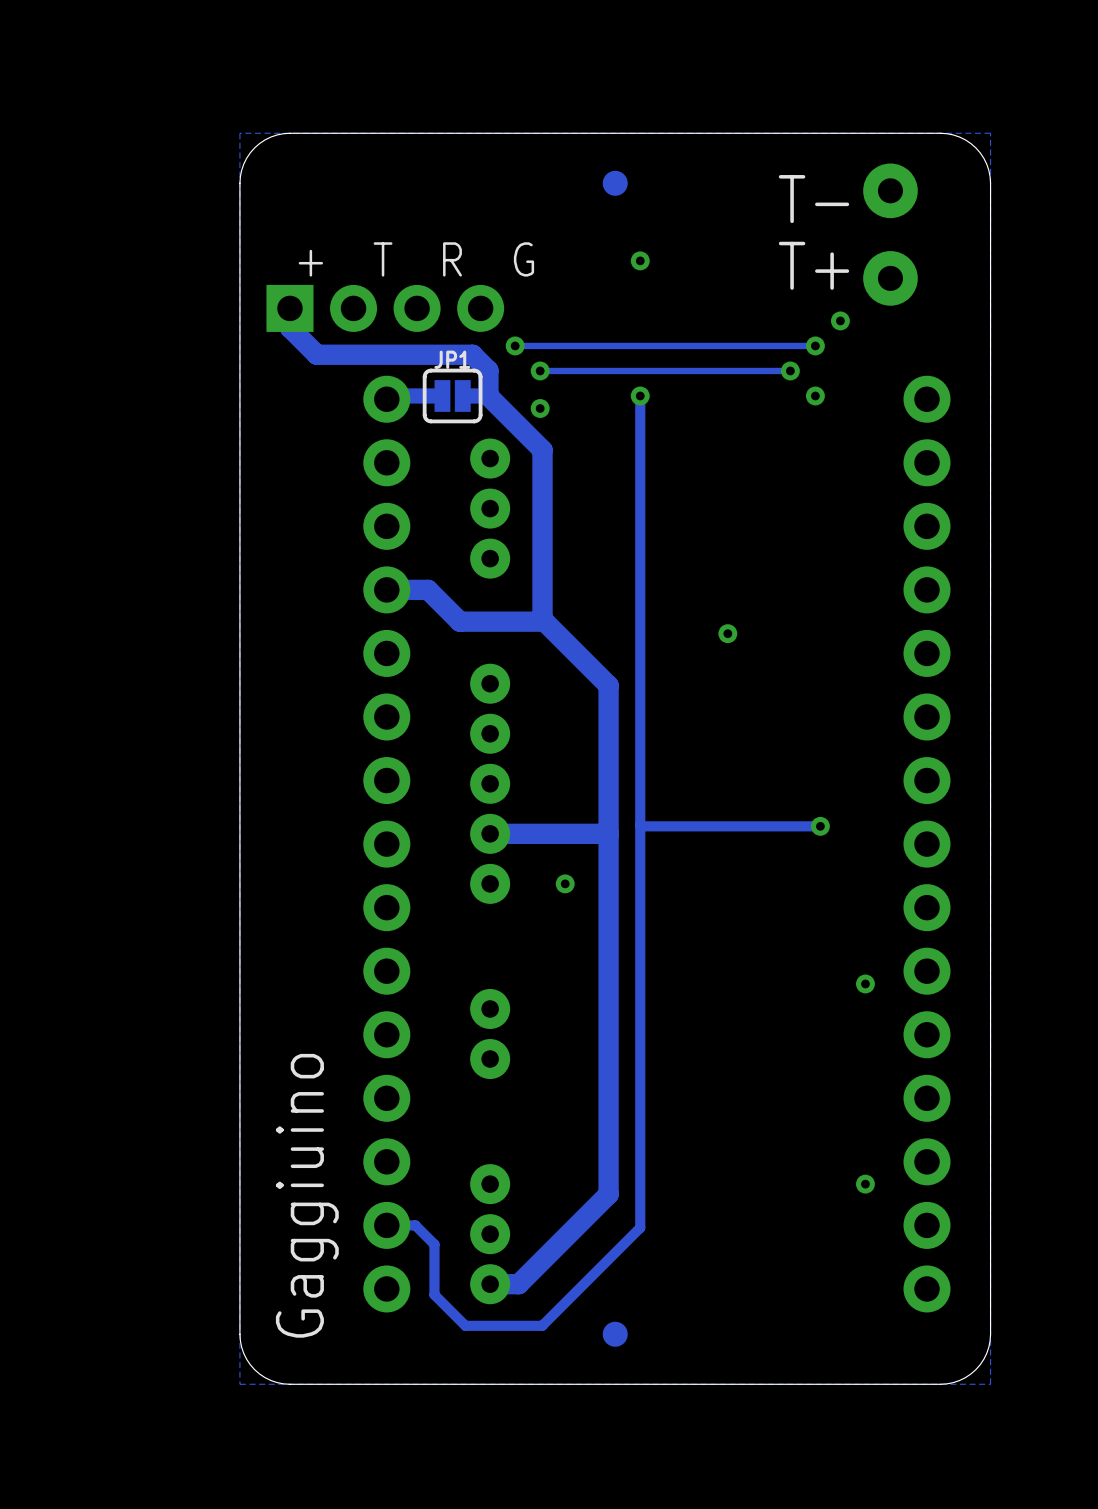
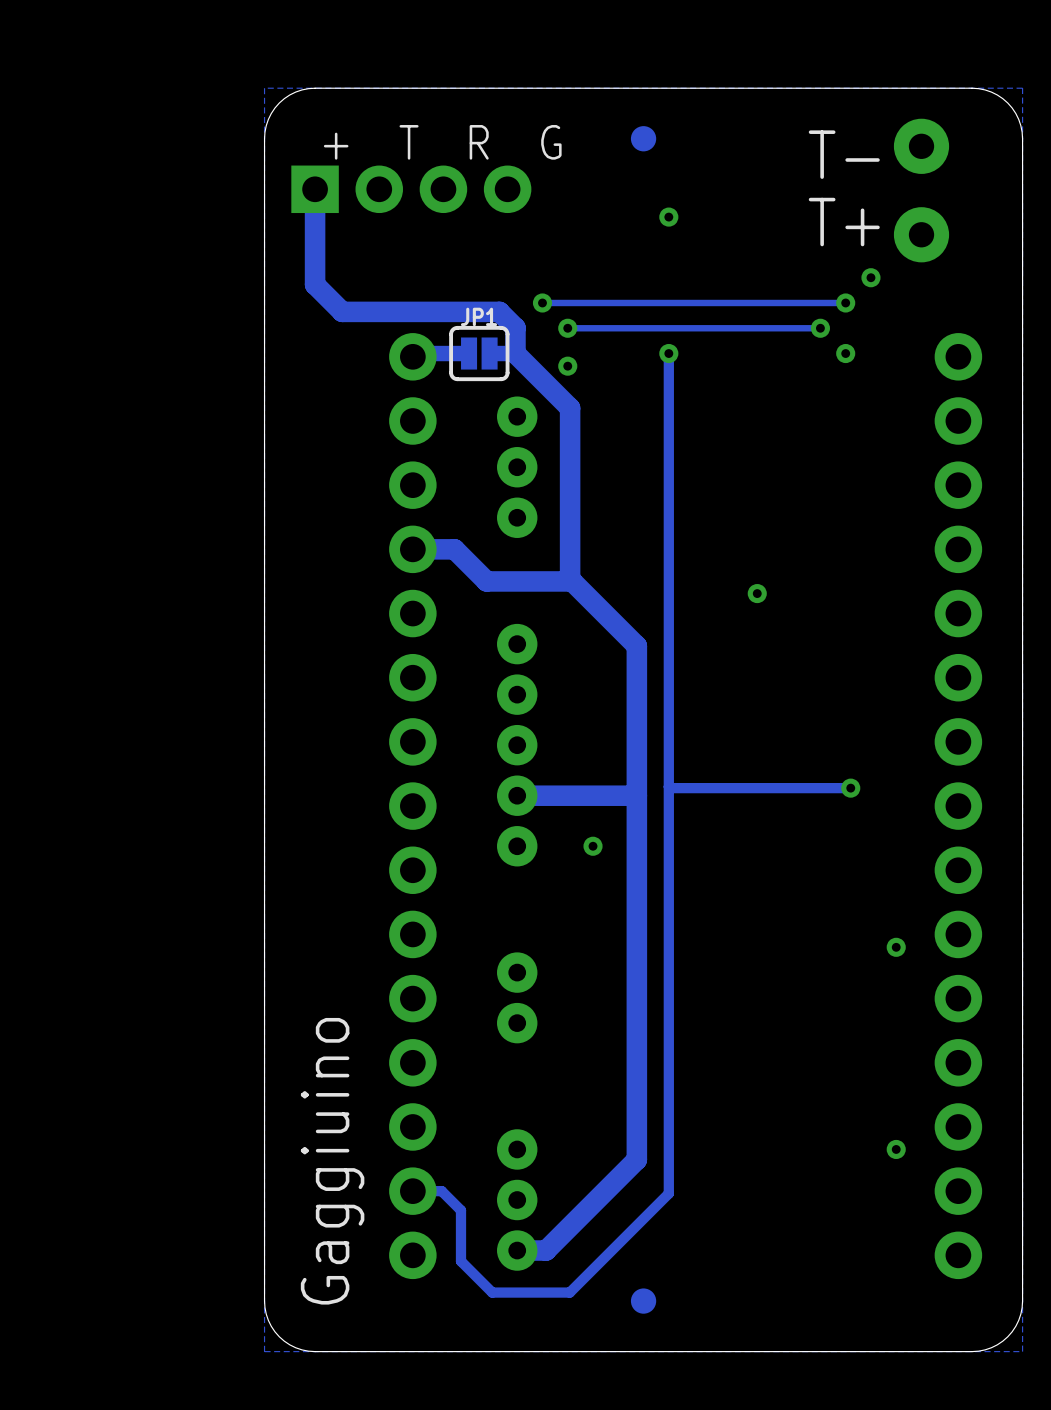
track: none -> (315, 189) (315, 265)
text position: + T R G (416, 259) -> + T R G (442, 142)
part position: (385, 308) -> (411, 189)

